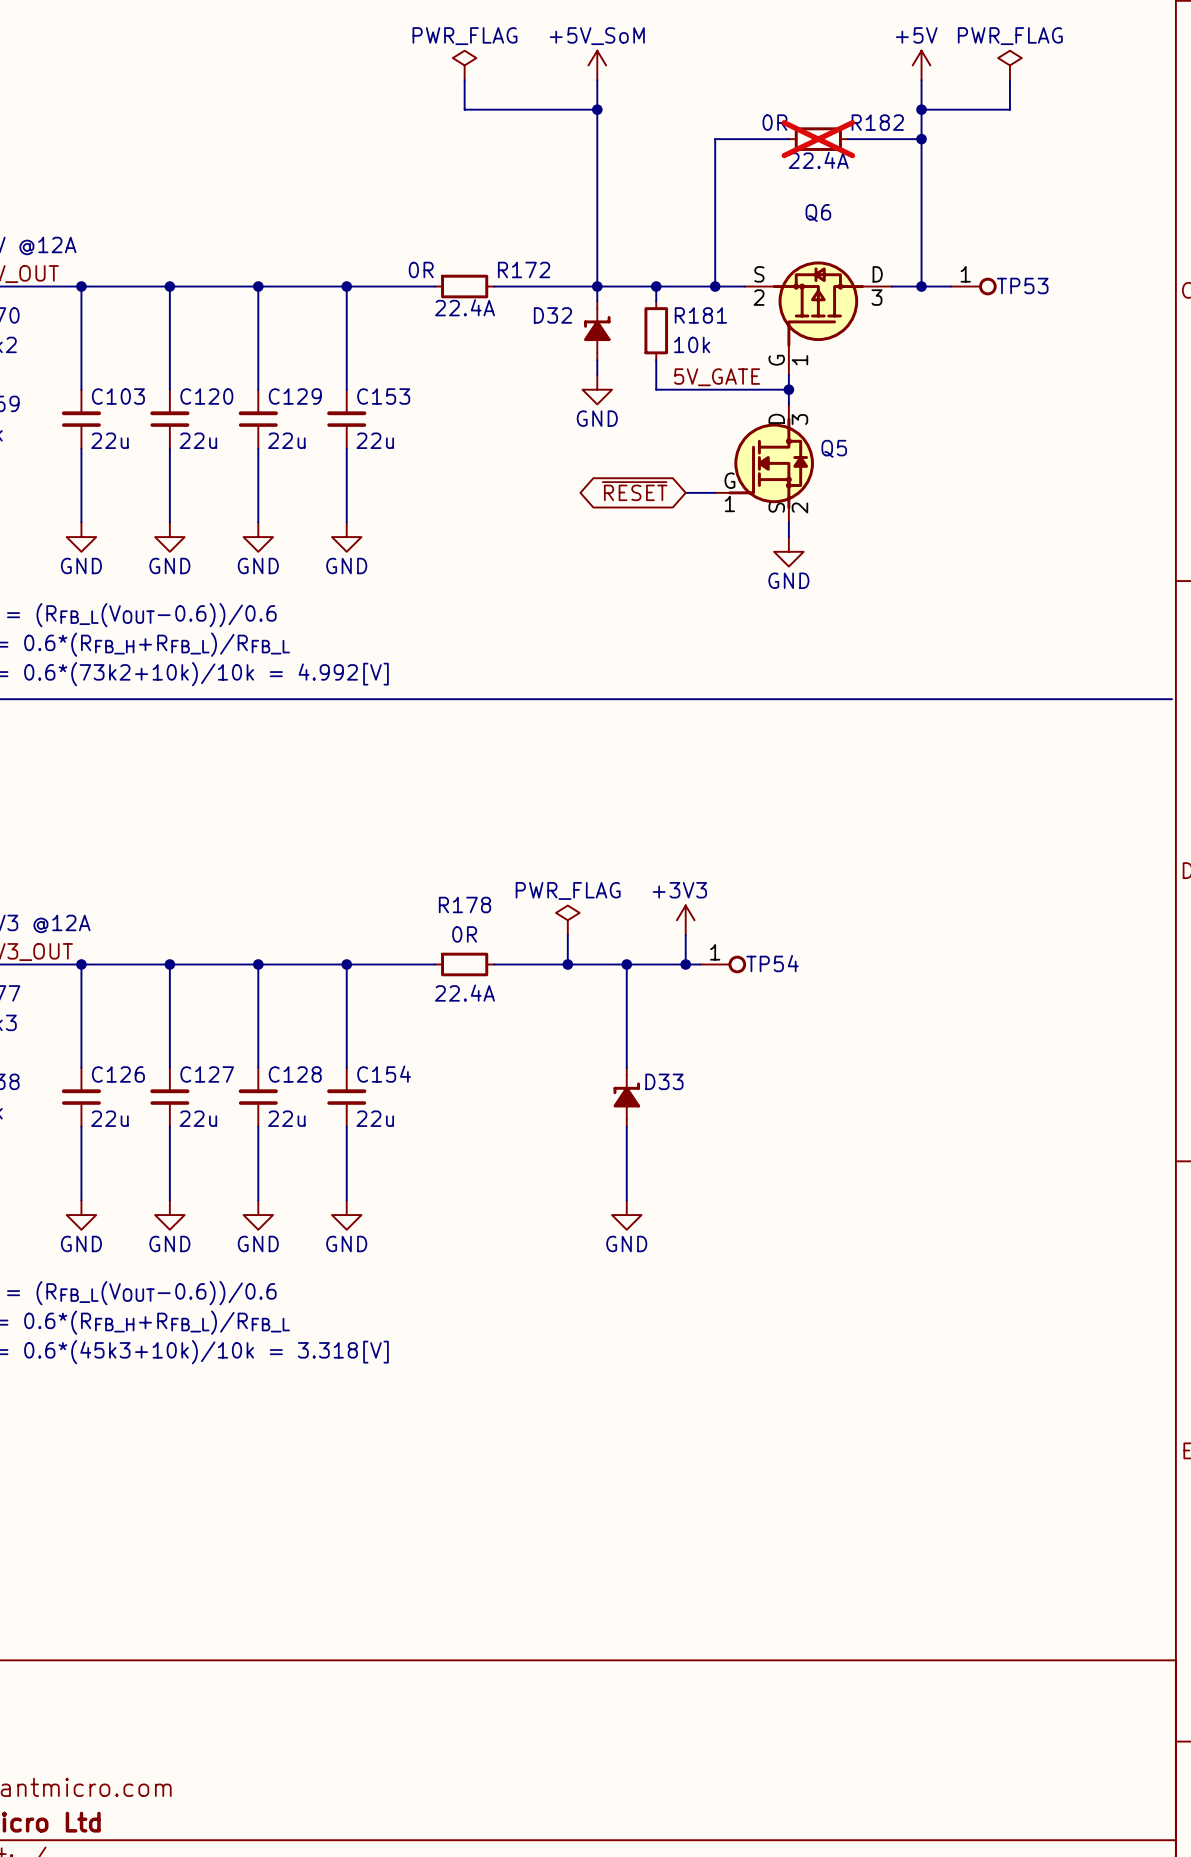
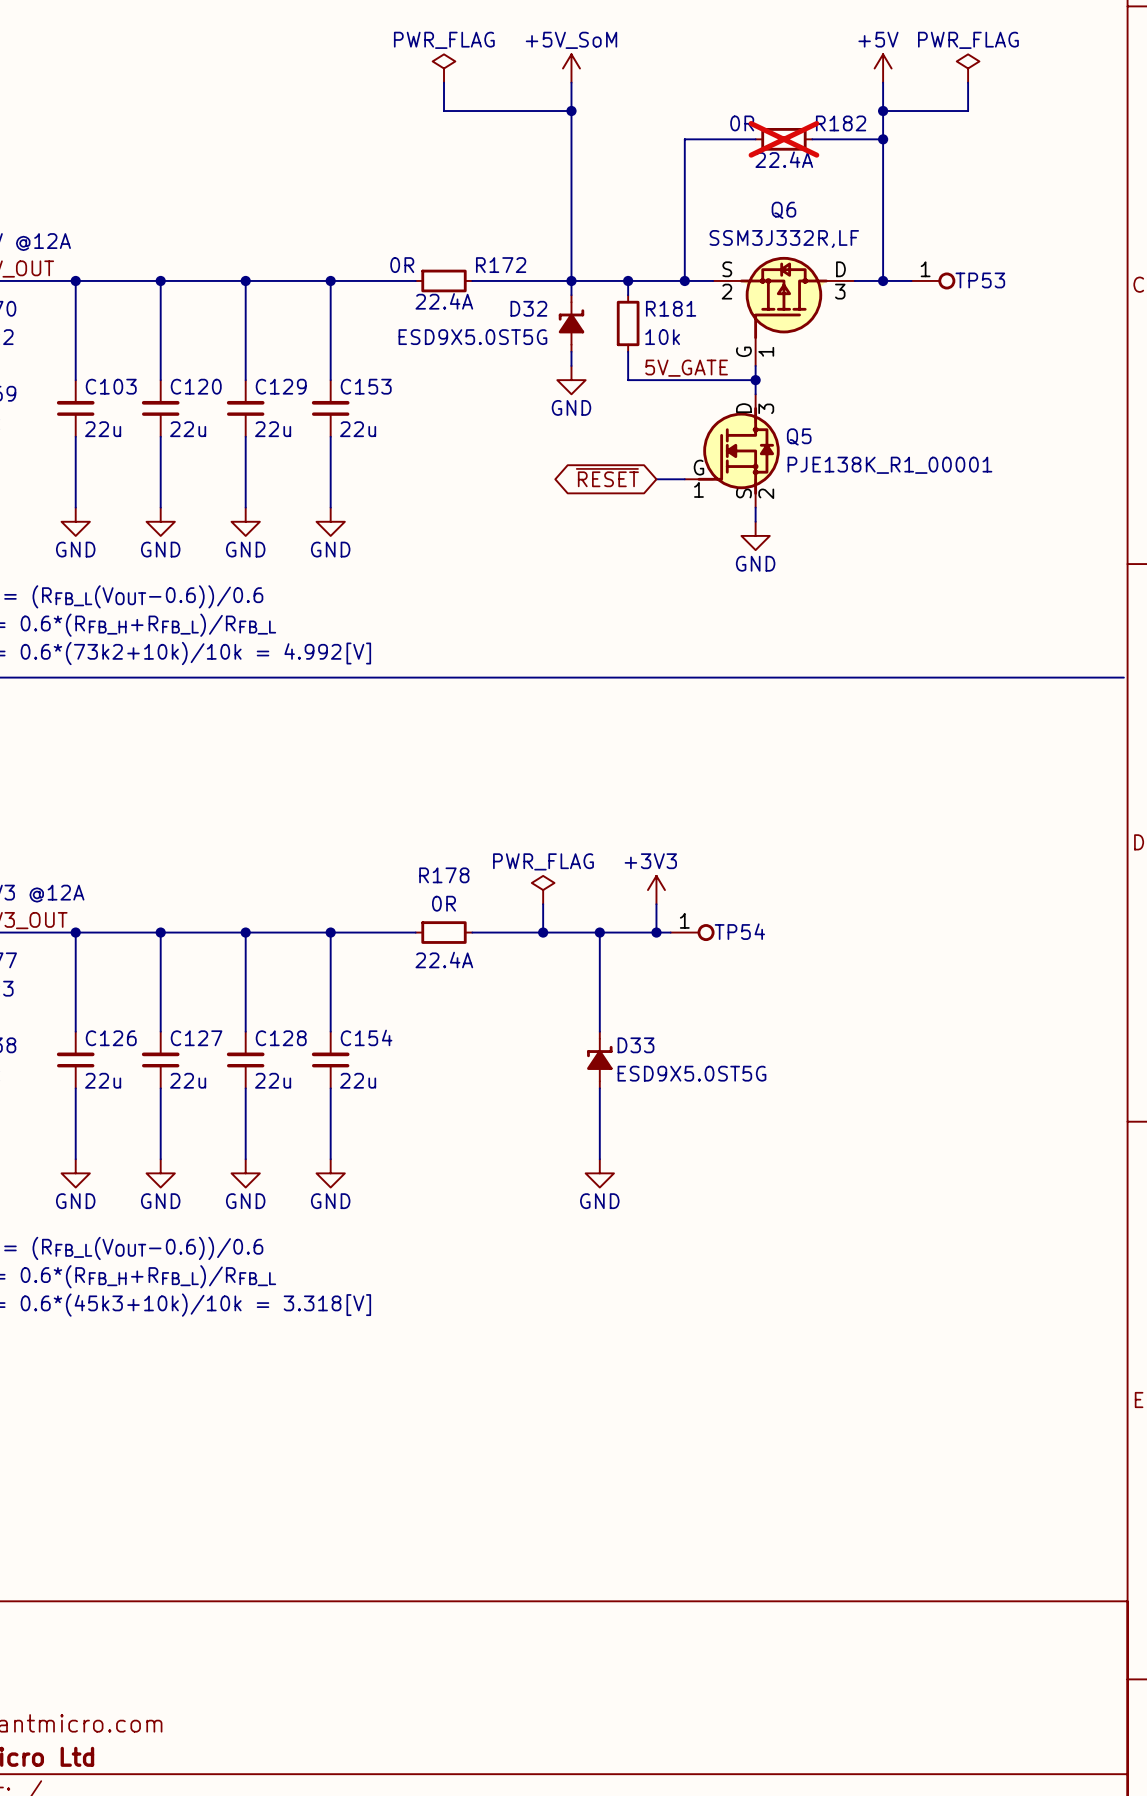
Q6 text: none -> SSM3J332R,LF (784, 238)
D32 text: none -> ESD9X5.0ST5G (472, 337)
Q5 text: none -> PJE138K_R1_00001 (889, 465)
D33 text: none -> ESD9X5.0ST5G (691, 1073)

